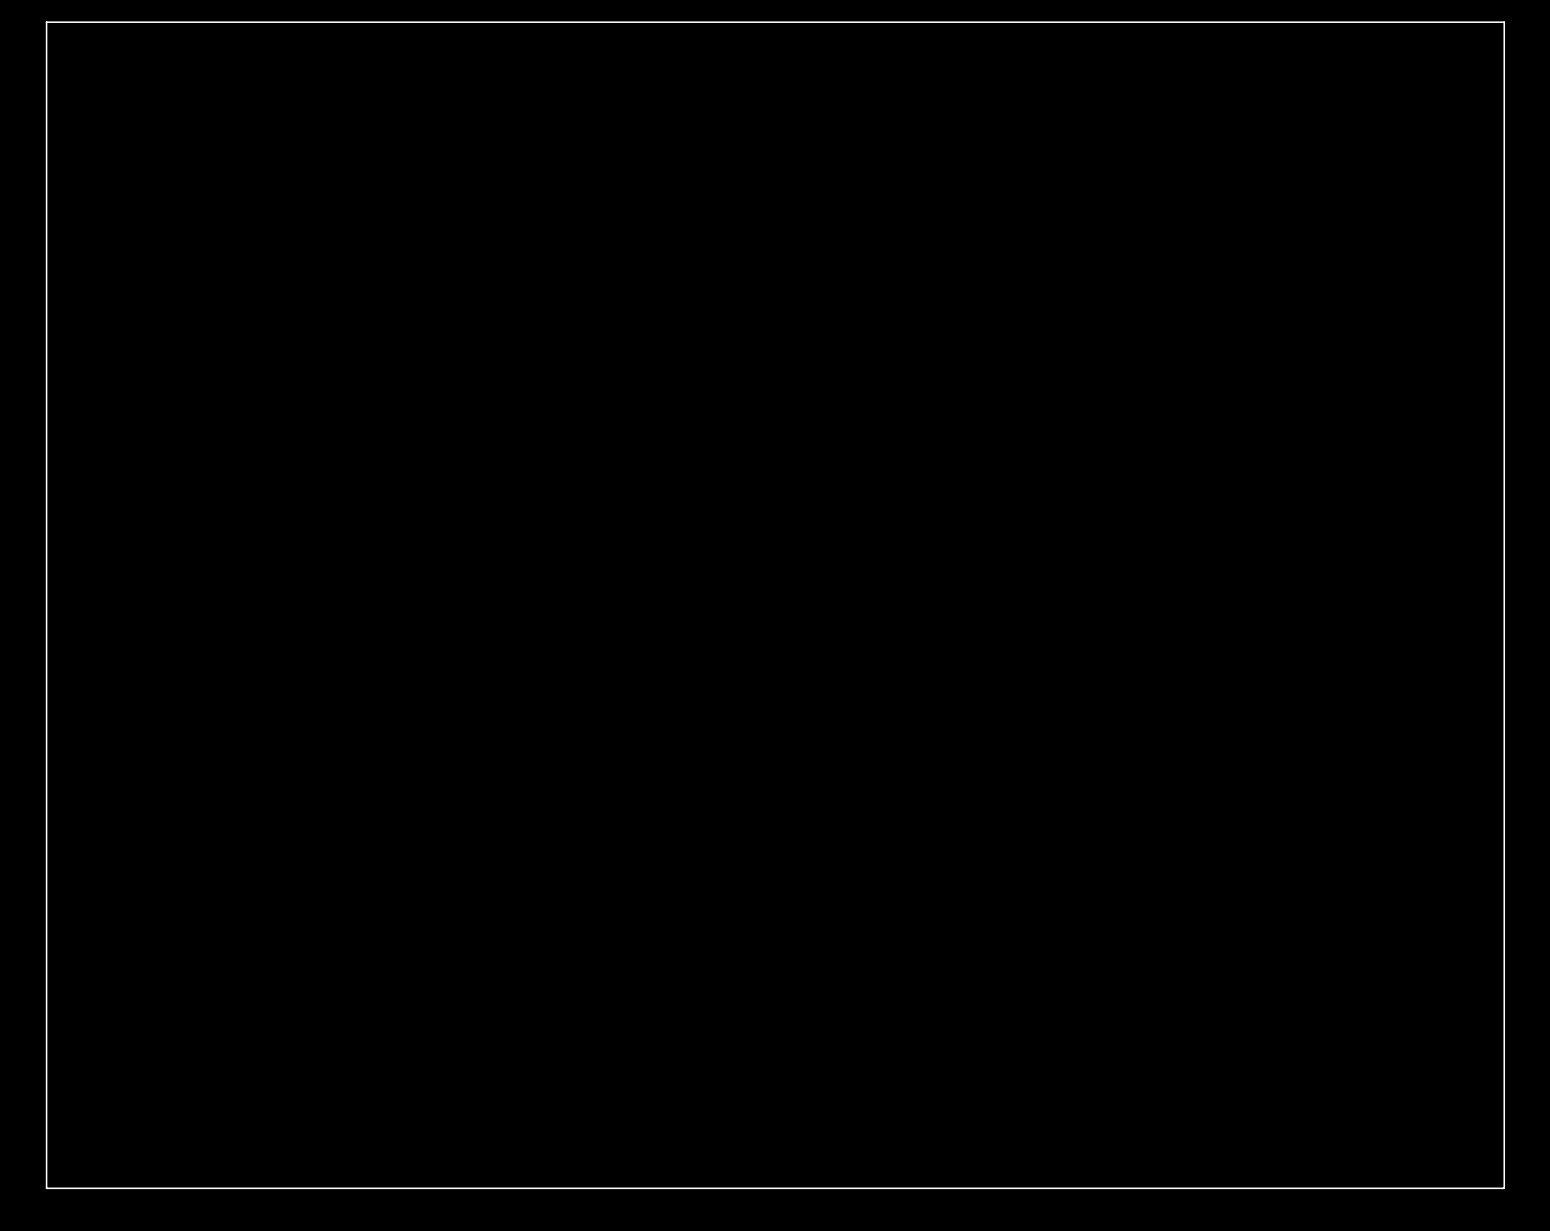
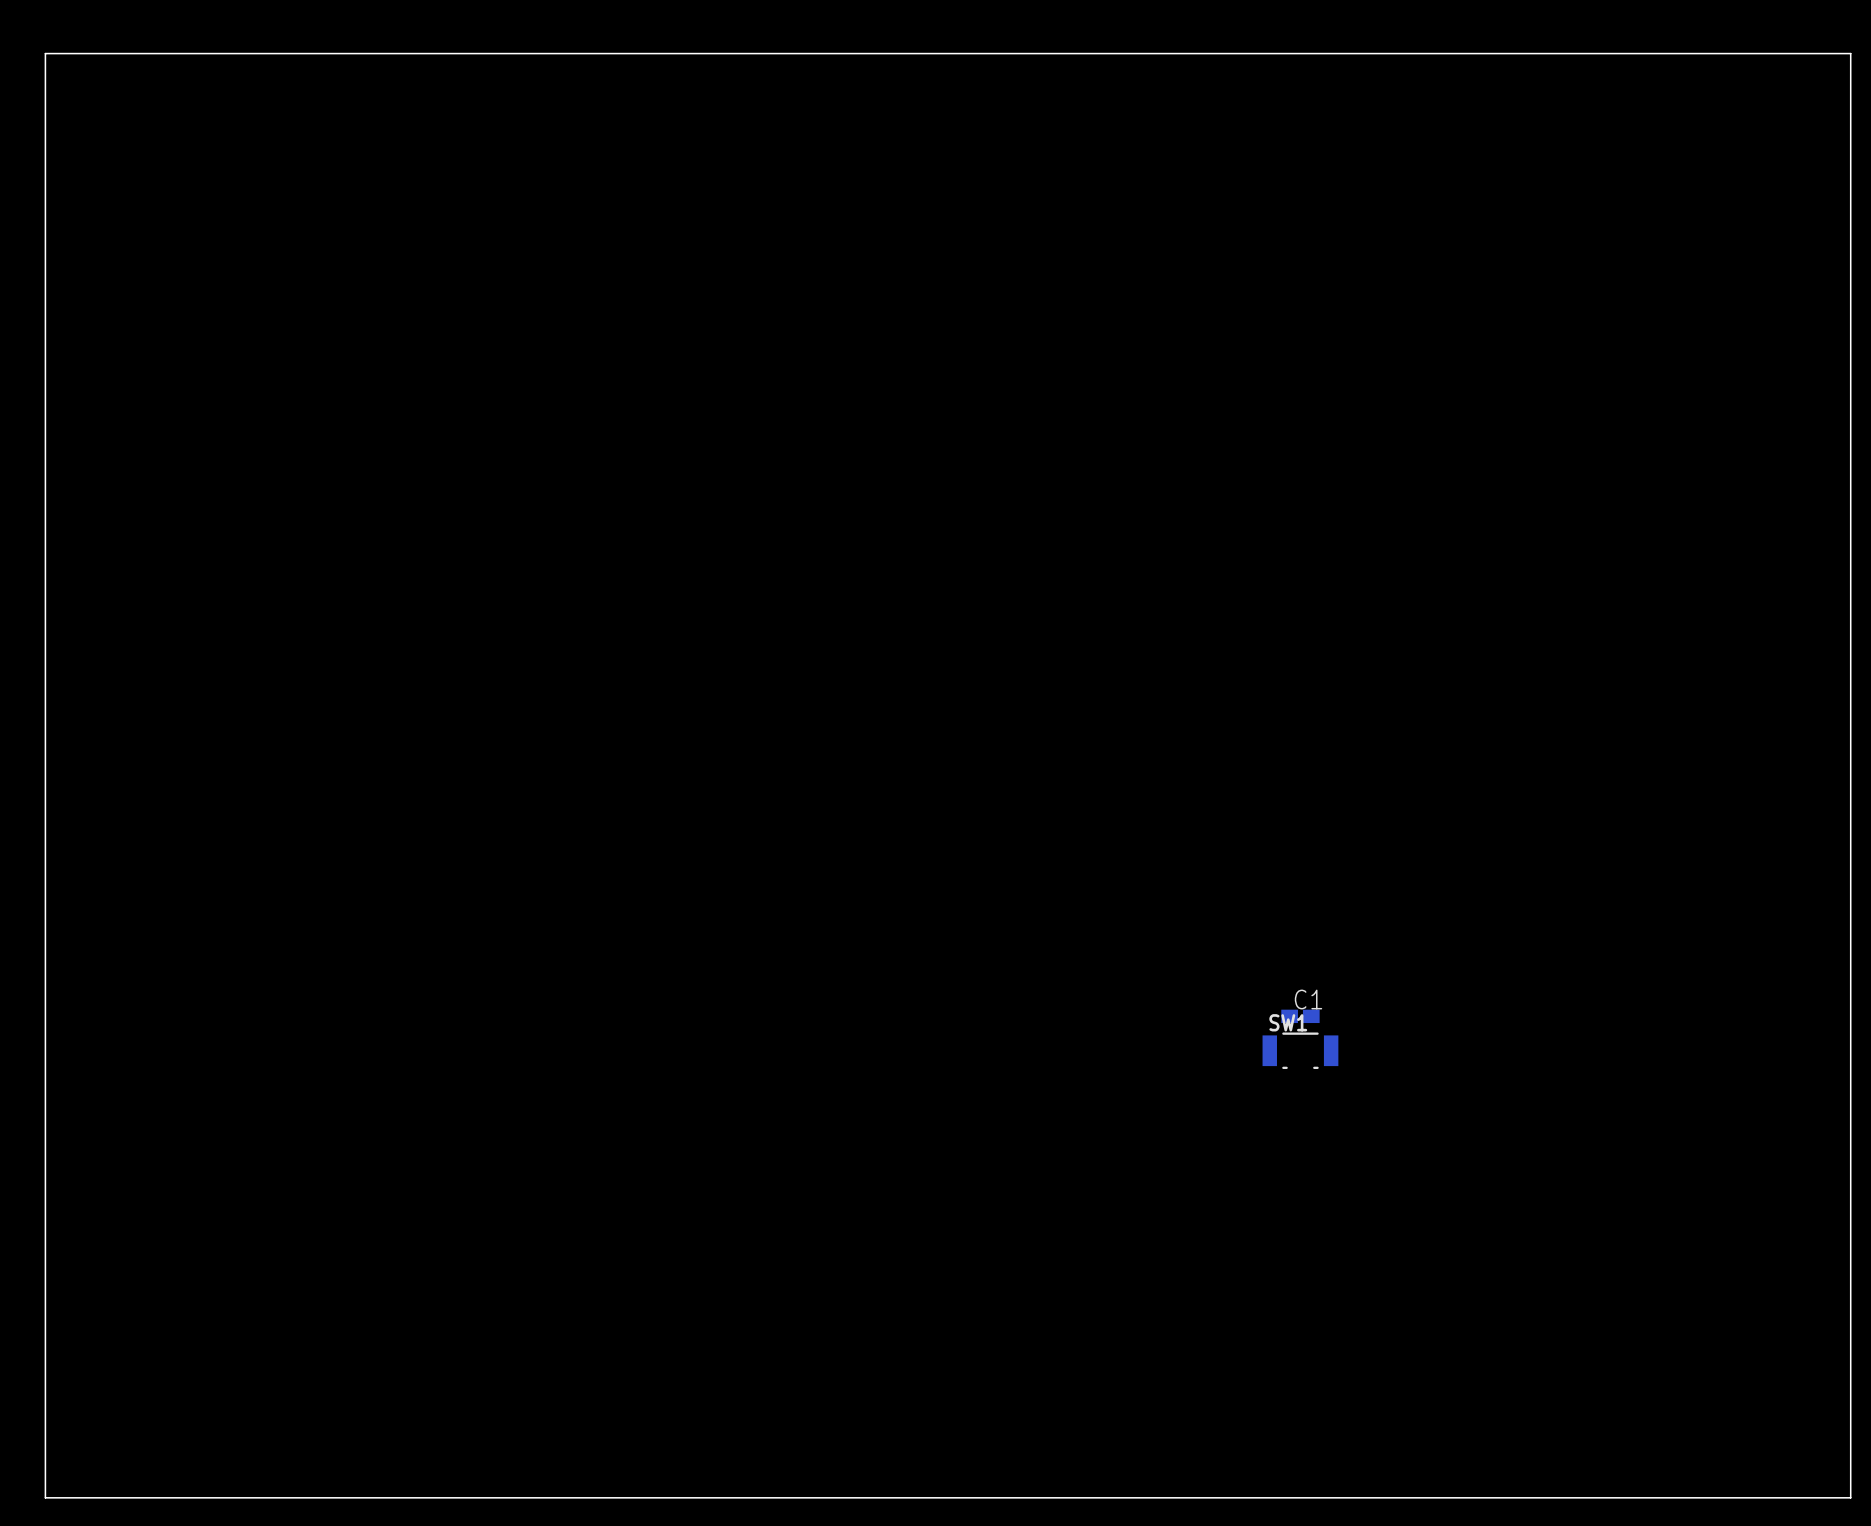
C1: none -> (1300, 1016)
SW1: none -> (1300, 1050)

